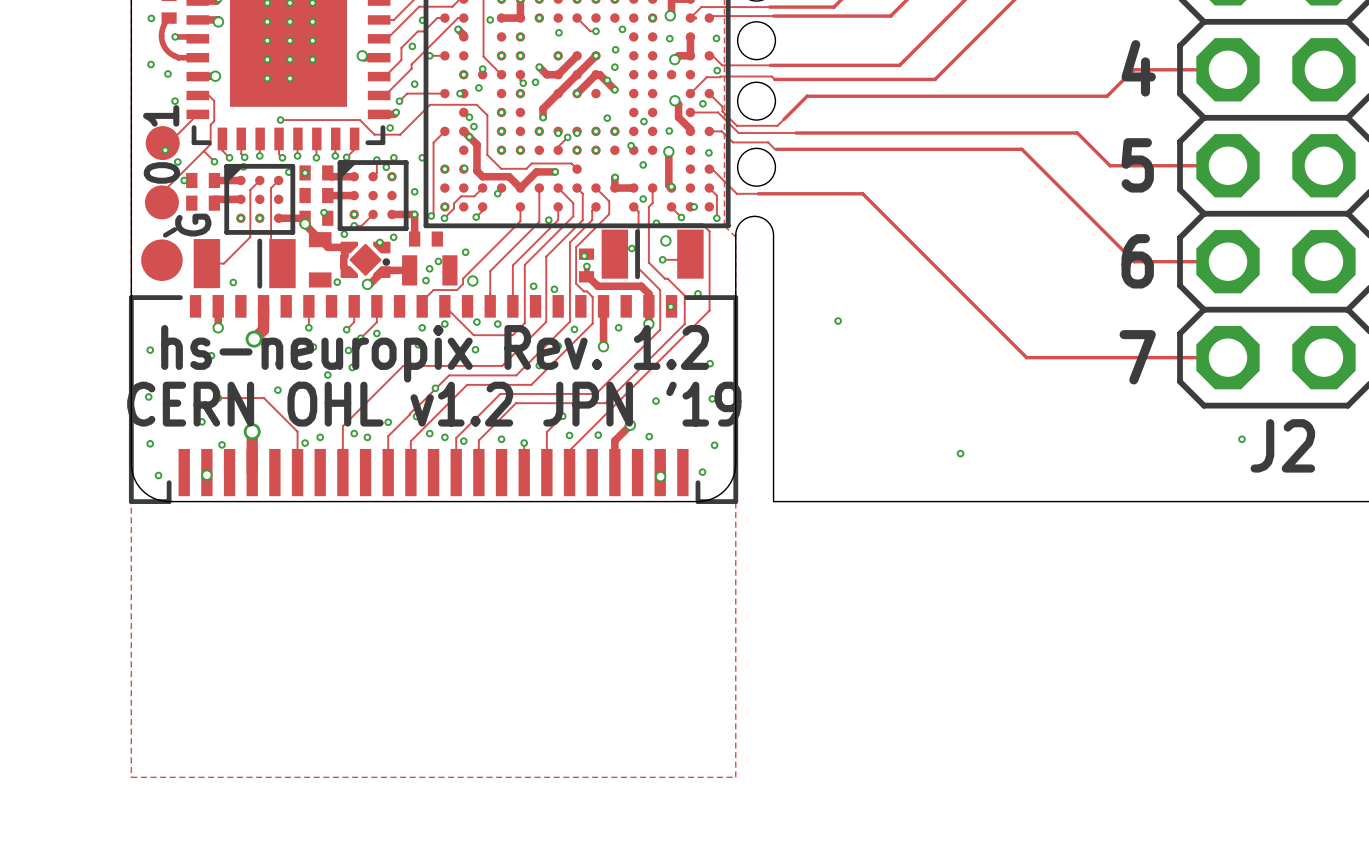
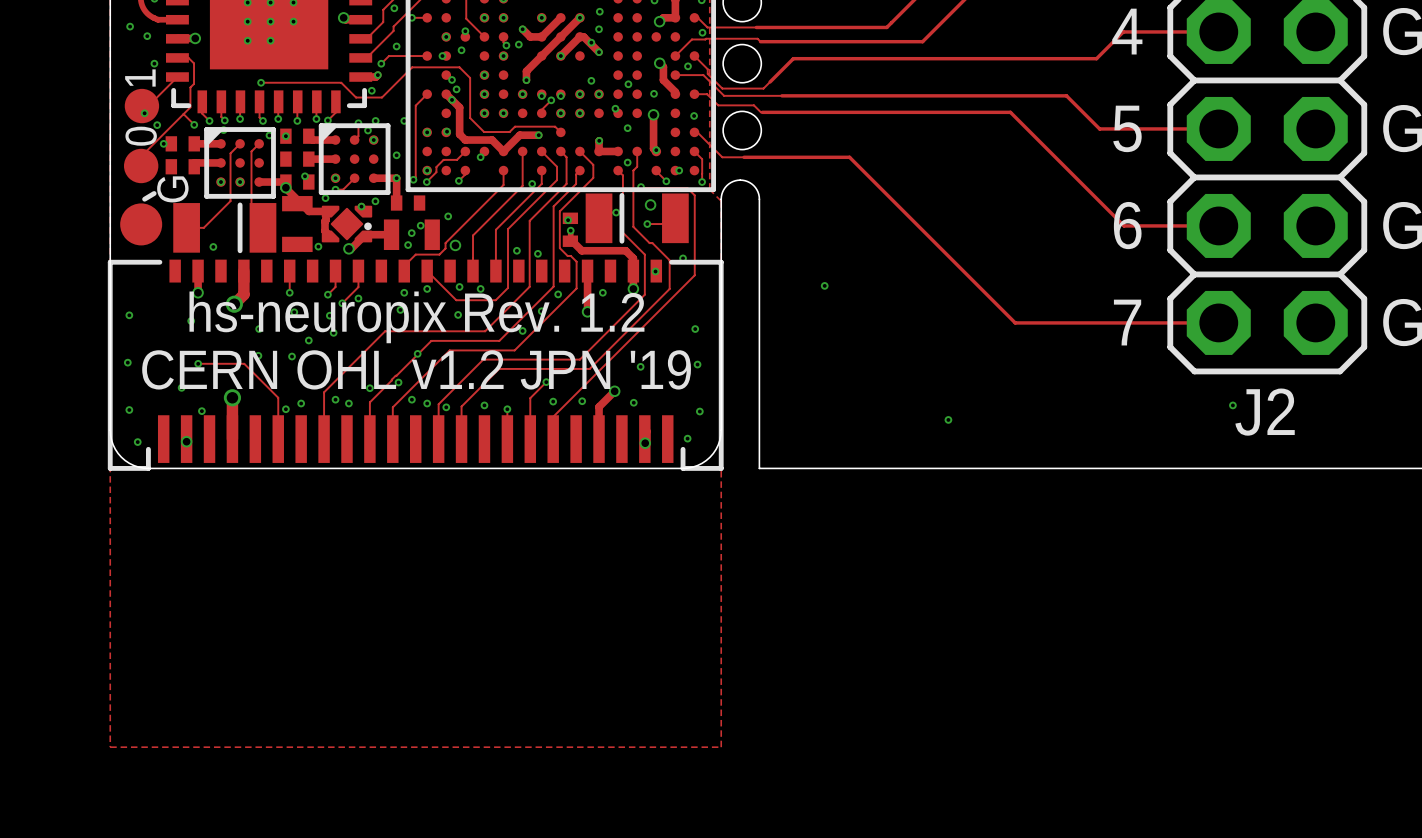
part footprint: [308, 232, 332, 288] -> [282, 196, 313, 253]

